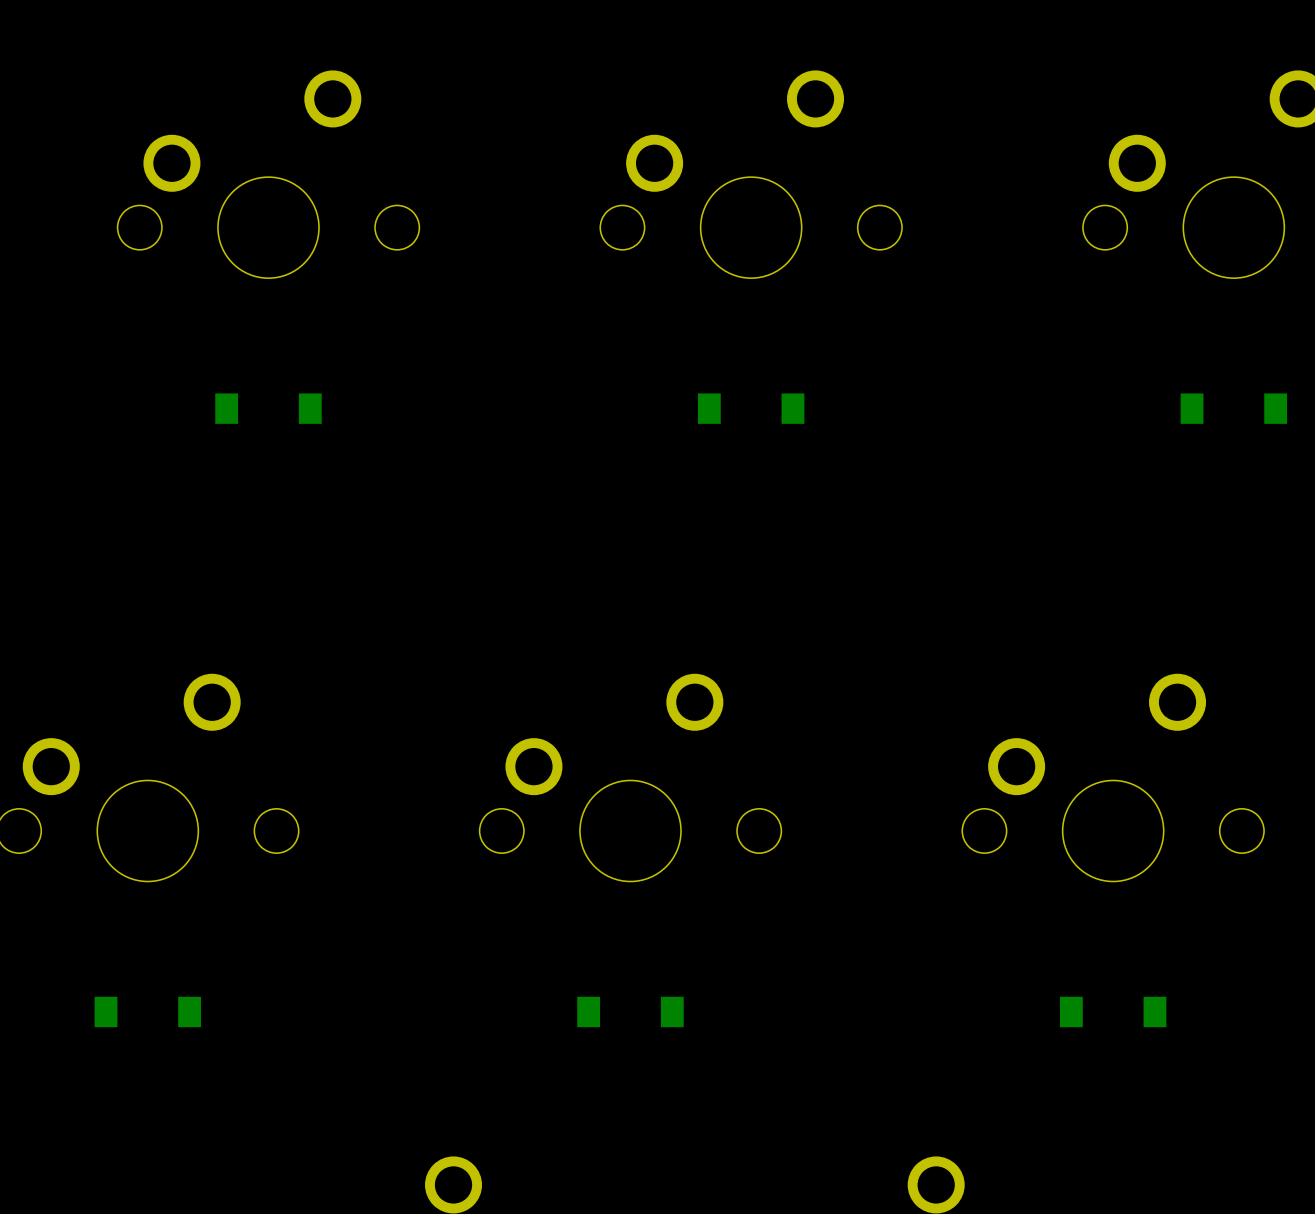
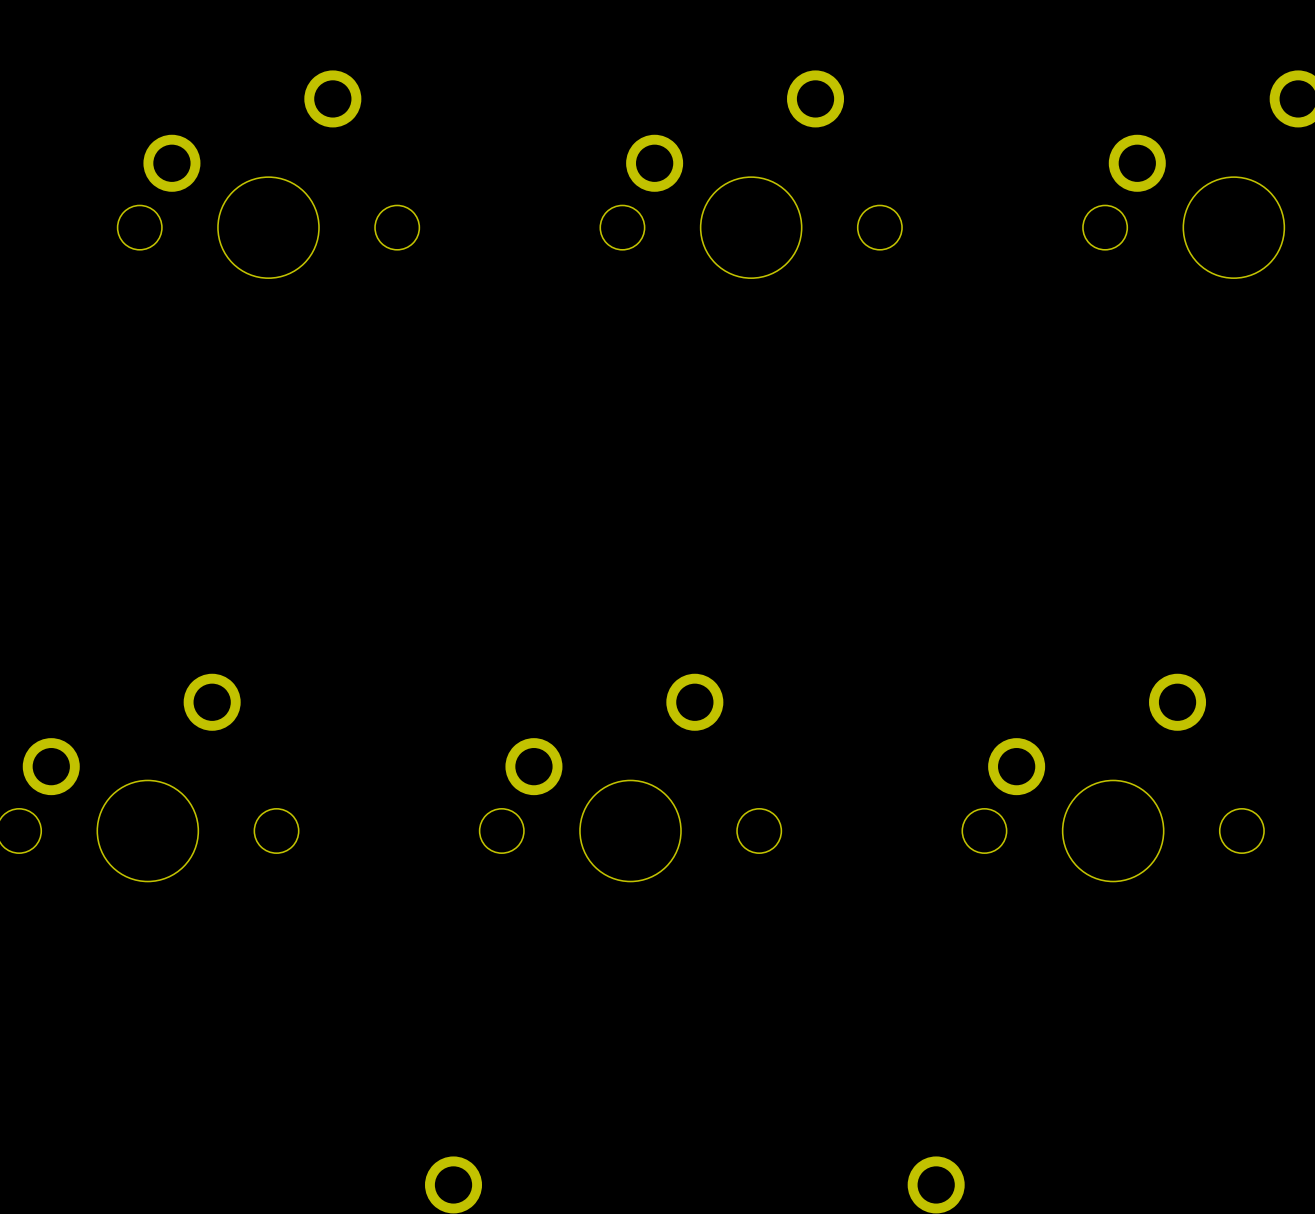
part: (268, 408) -> none
part: (751, 408) -> none
part: (1233, 408) -> none
part: (147, 1011) -> none
part: (630, 1011) -> none
part: (1113, 1011) -> none

